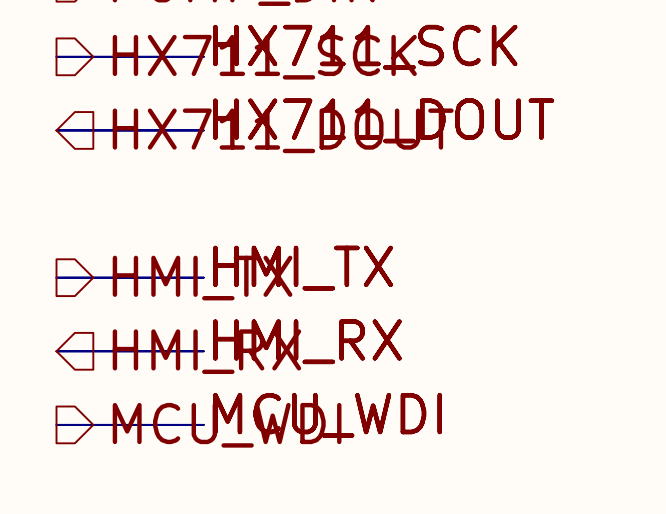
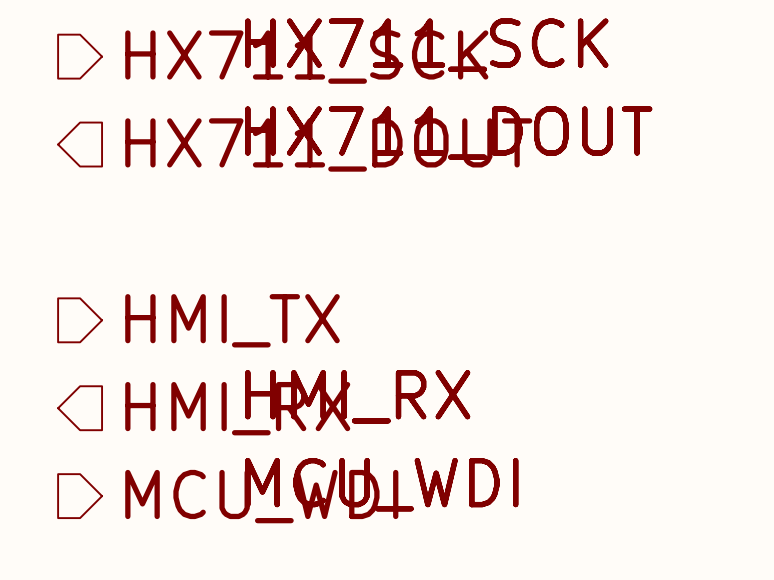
wire: (56, 56) (203, 56) -> none
wire: (56, 130) (203, 130) -> none
label: HMI_TX (303, 268) -> none
wire: (56, 277) (203, 277) -> none
wire: (56, 351) (203, 351) -> none
wire: (56, 424) (203, 424) -> none

